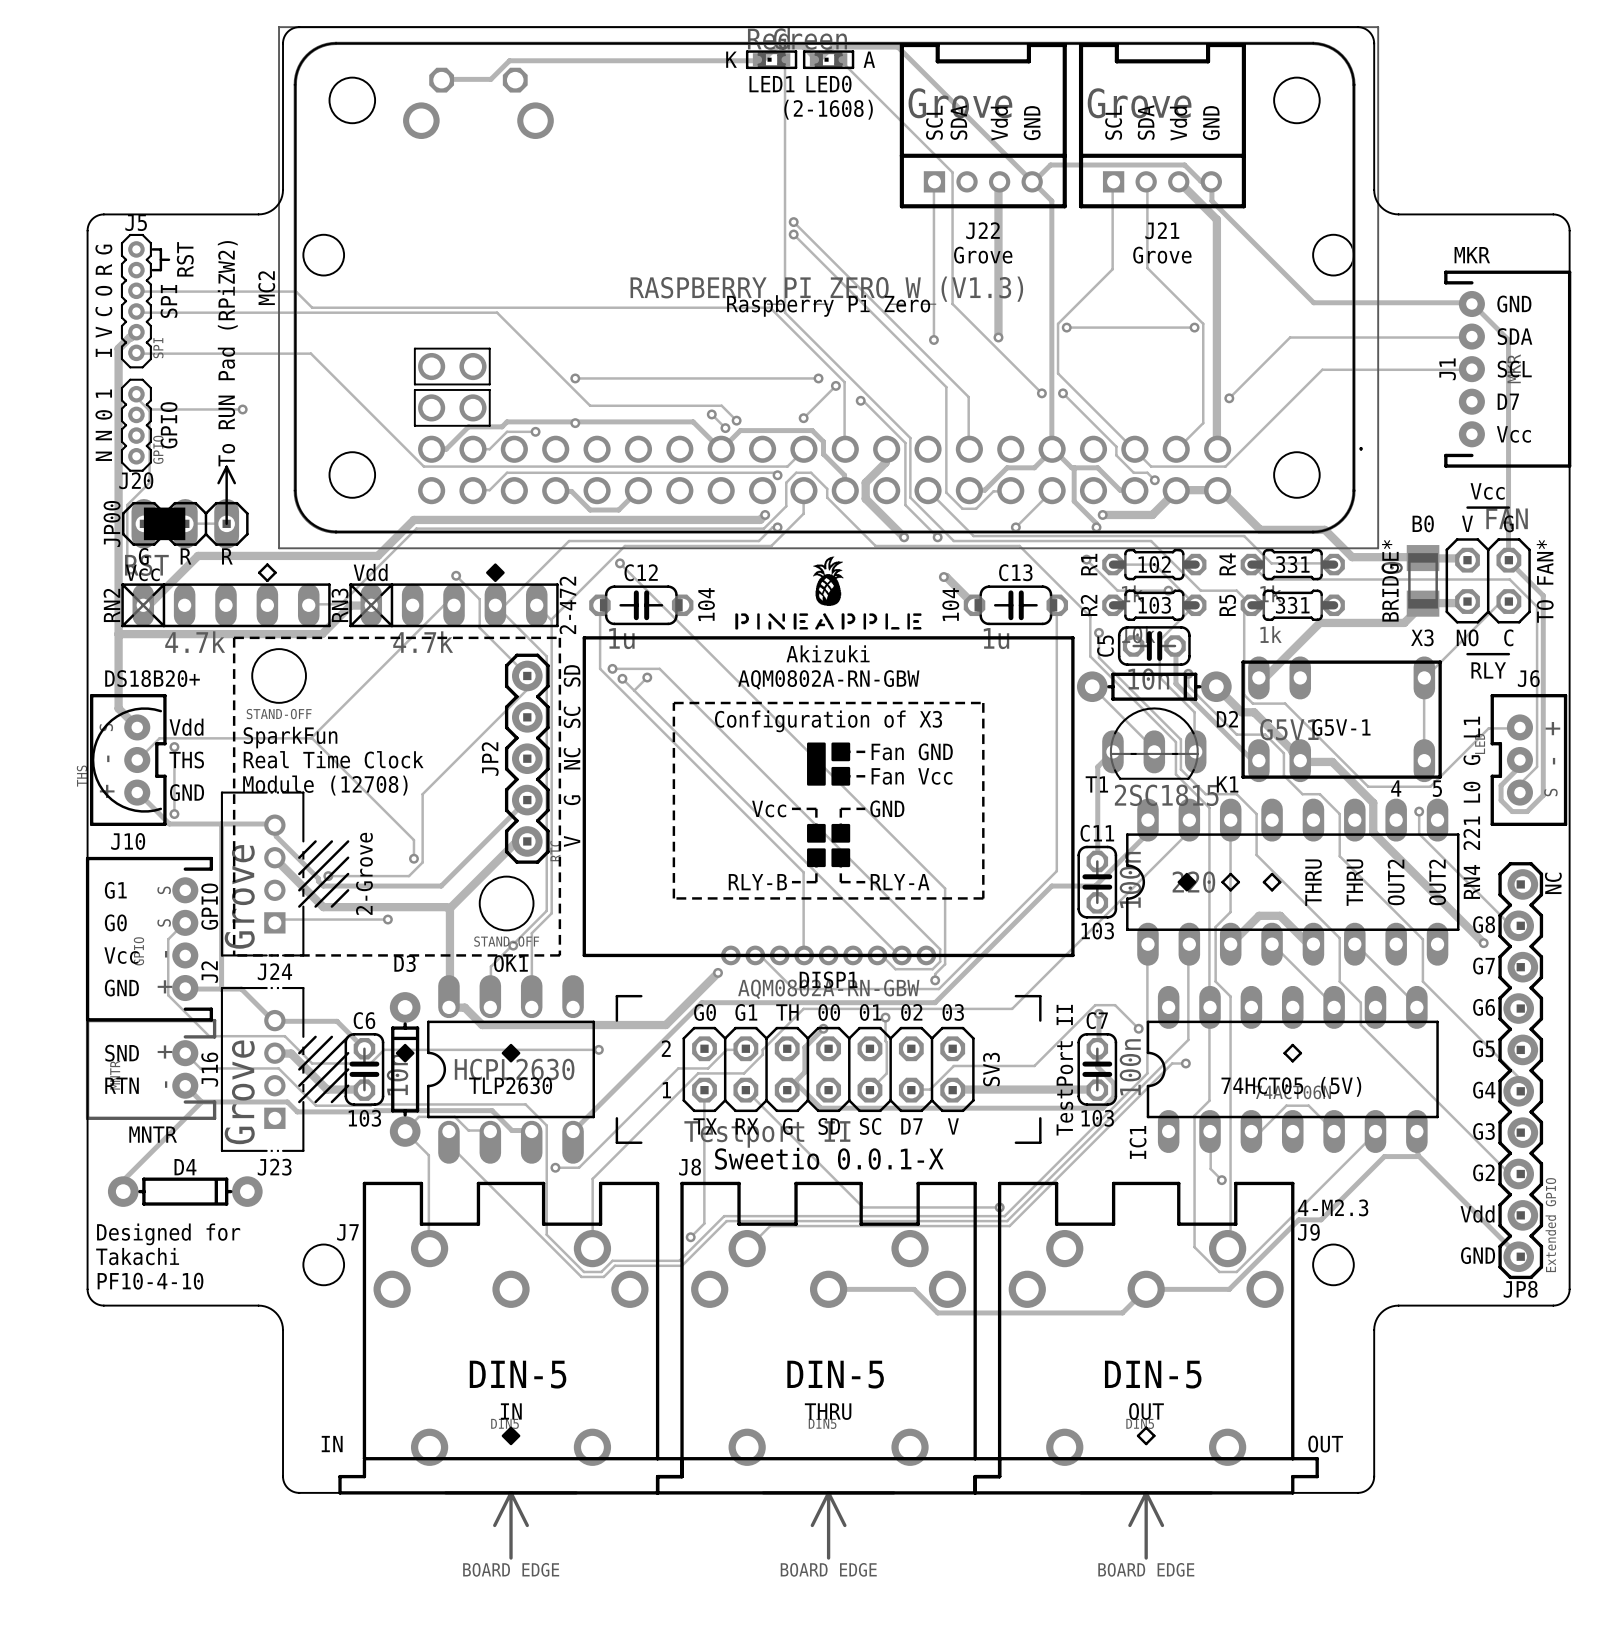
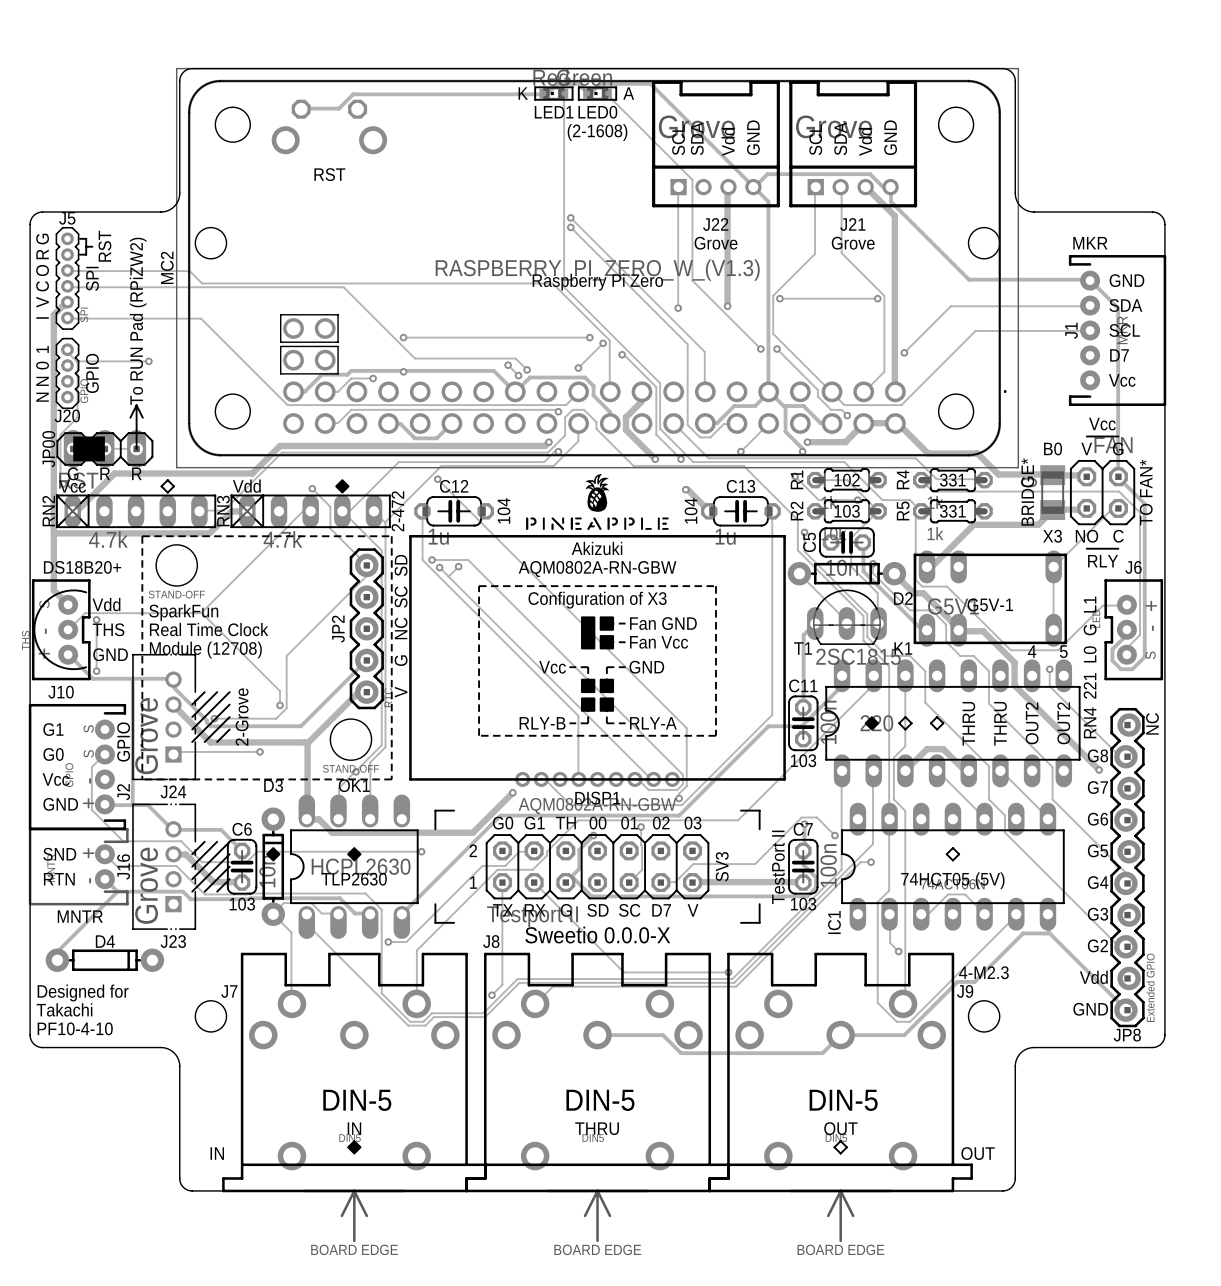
text: none -> RST (329, 174)
text: Sweetio 0.0.1-X (829, 1158) -> Sweetio 0.0.0-X (597, 935)

